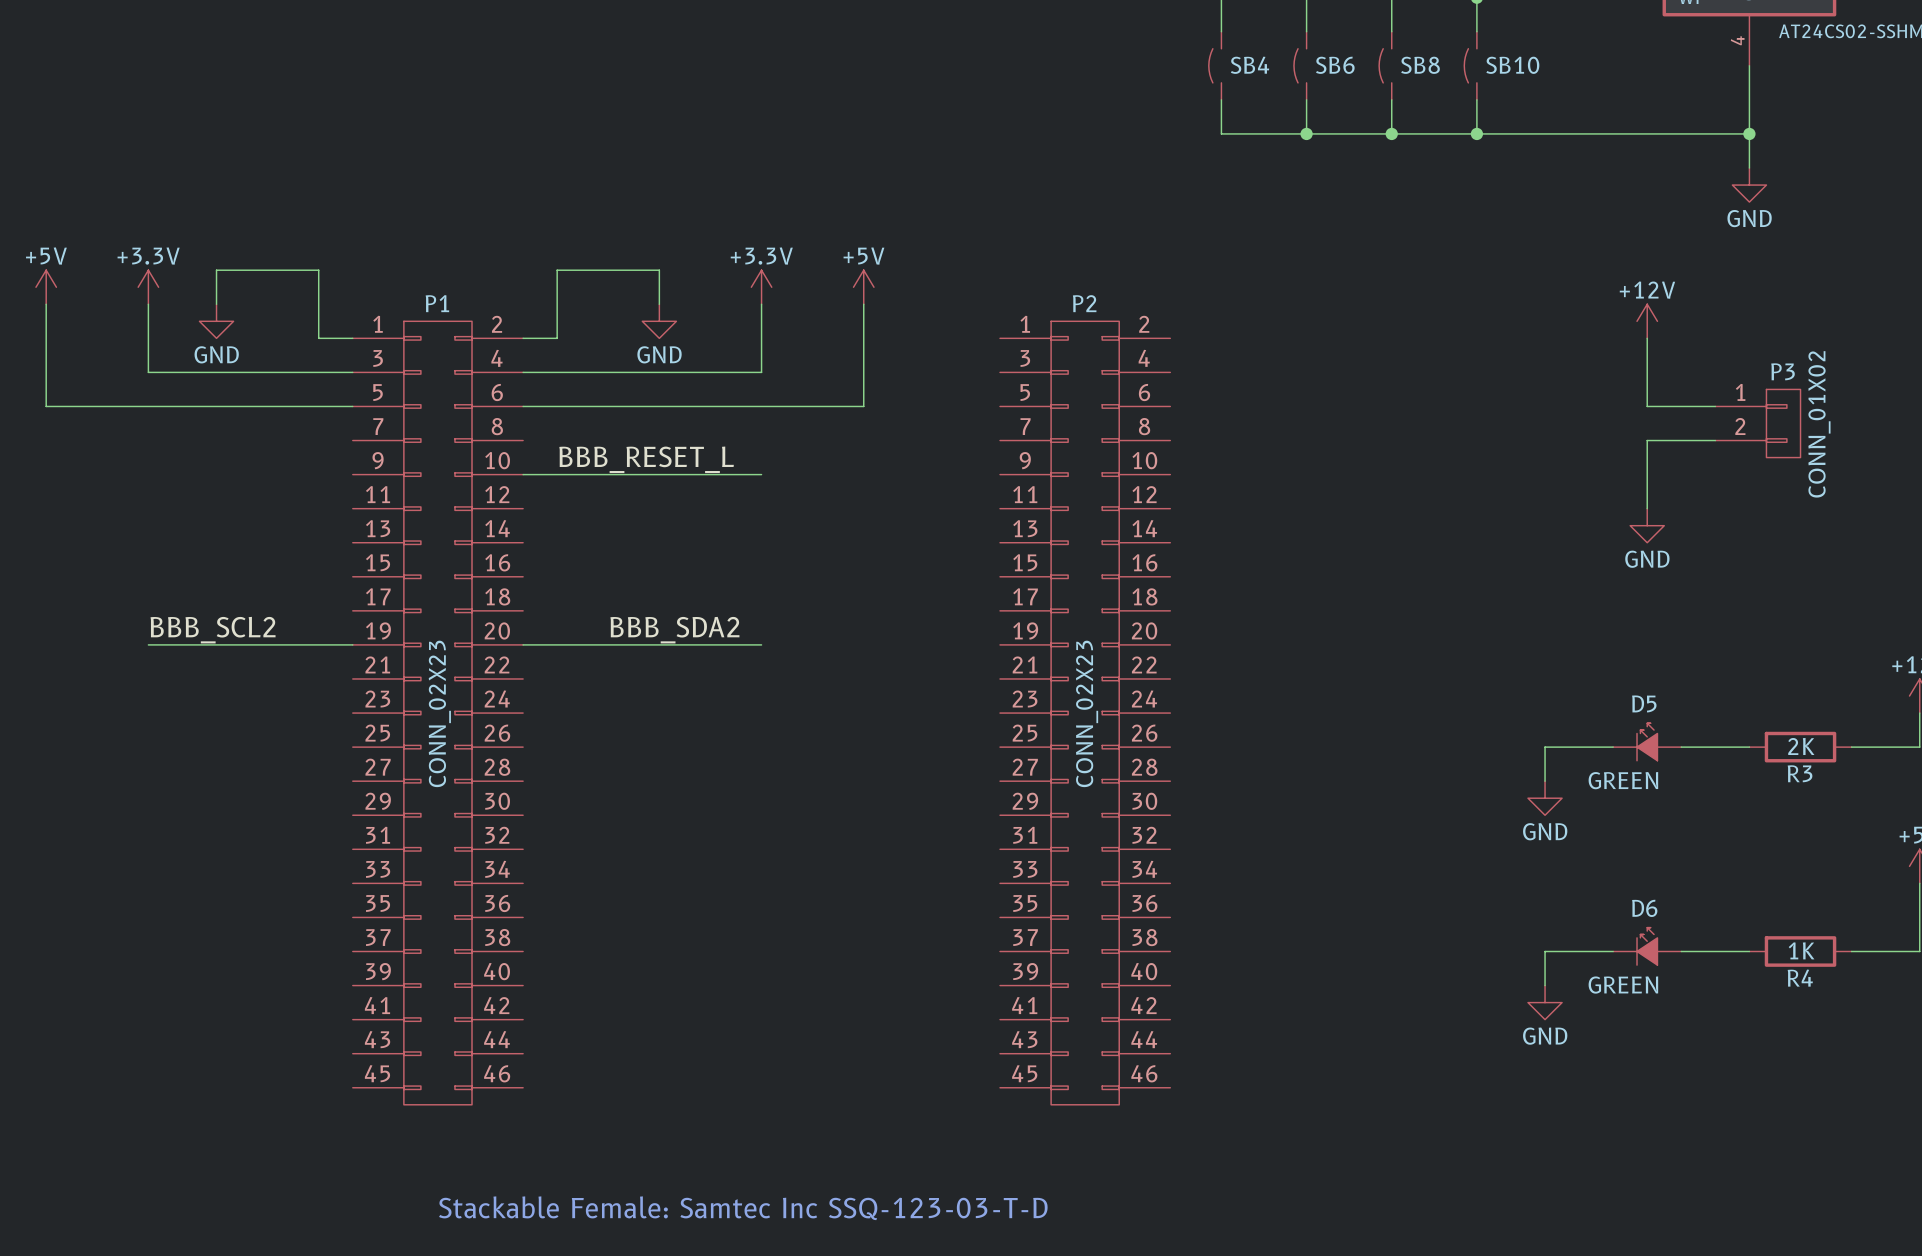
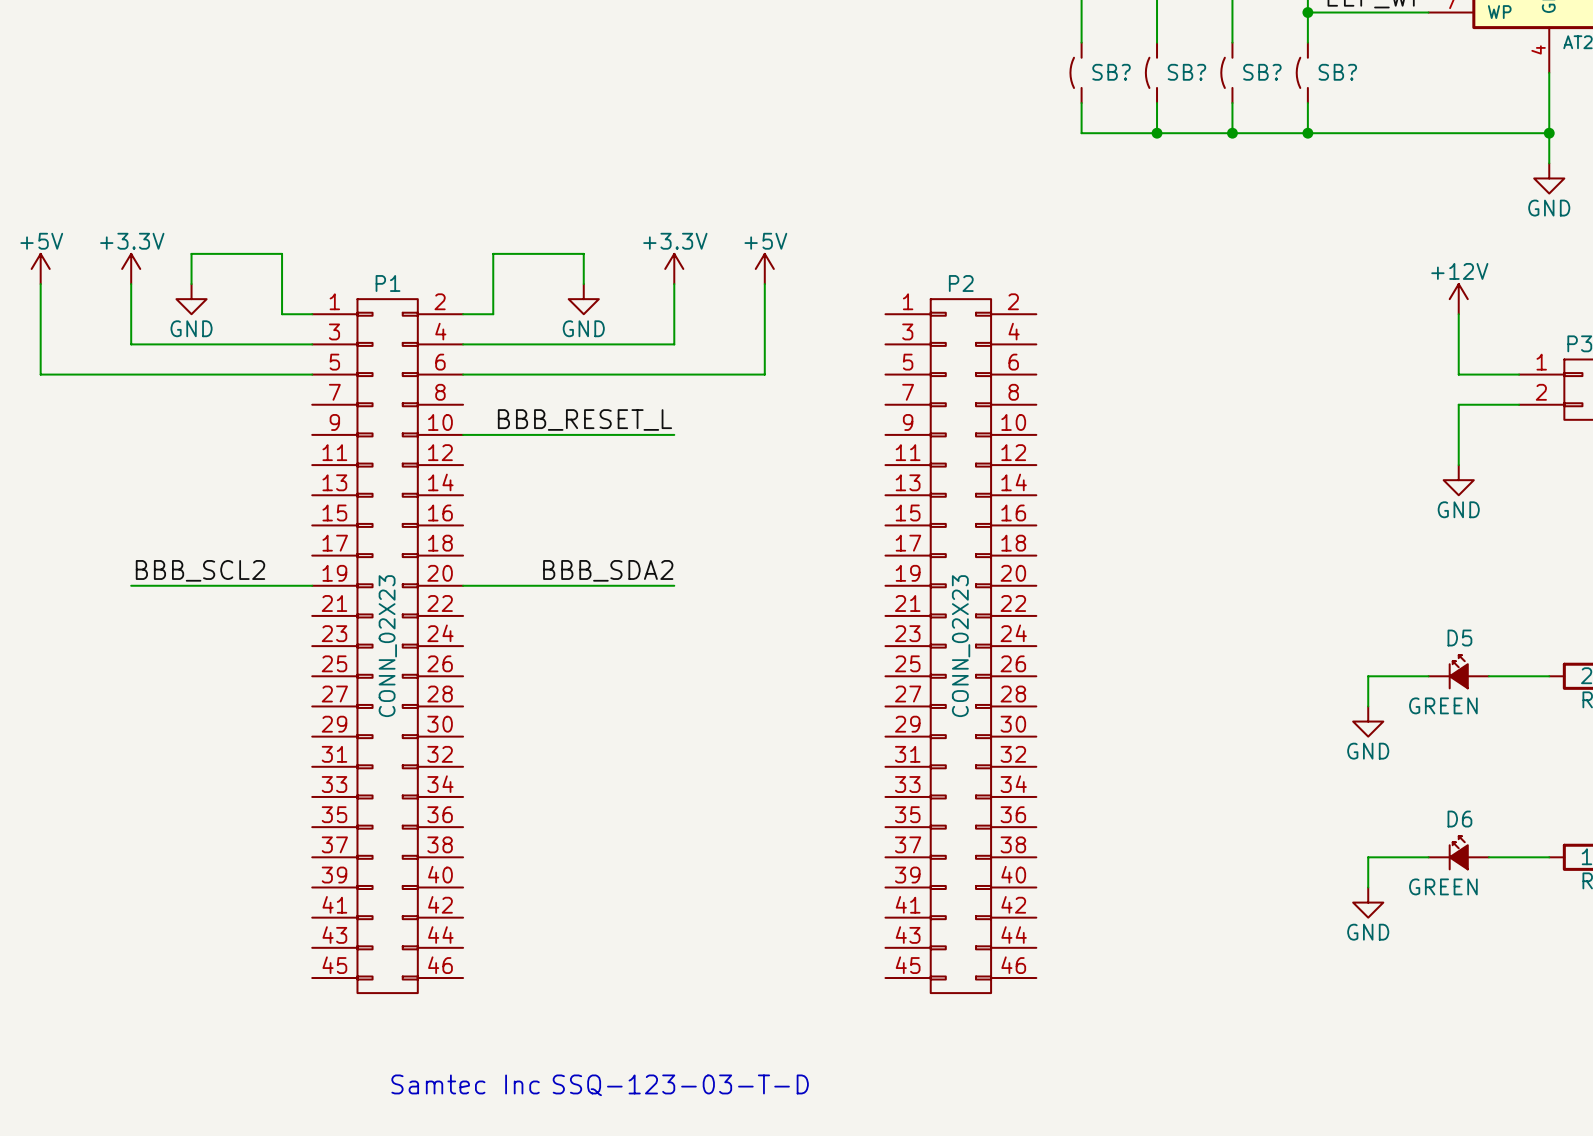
SB4 name: SB4 (1250, 65) -> SB? (1111, 72)
SB6 name: SB6 (1335, 65) -> SB? (1186, 72)
SB8 name: SB8 (1420, 65) -> SB? (1262, 72)
SB10 name: SB10 (1512, 65) -> SB? (1337, 72)
text: Stackable Female: Samtec Inc SSQ-123-03-T-D (743, 1208) -> Samtec Inc SSQ-123-03-T-D (600, 1085)

